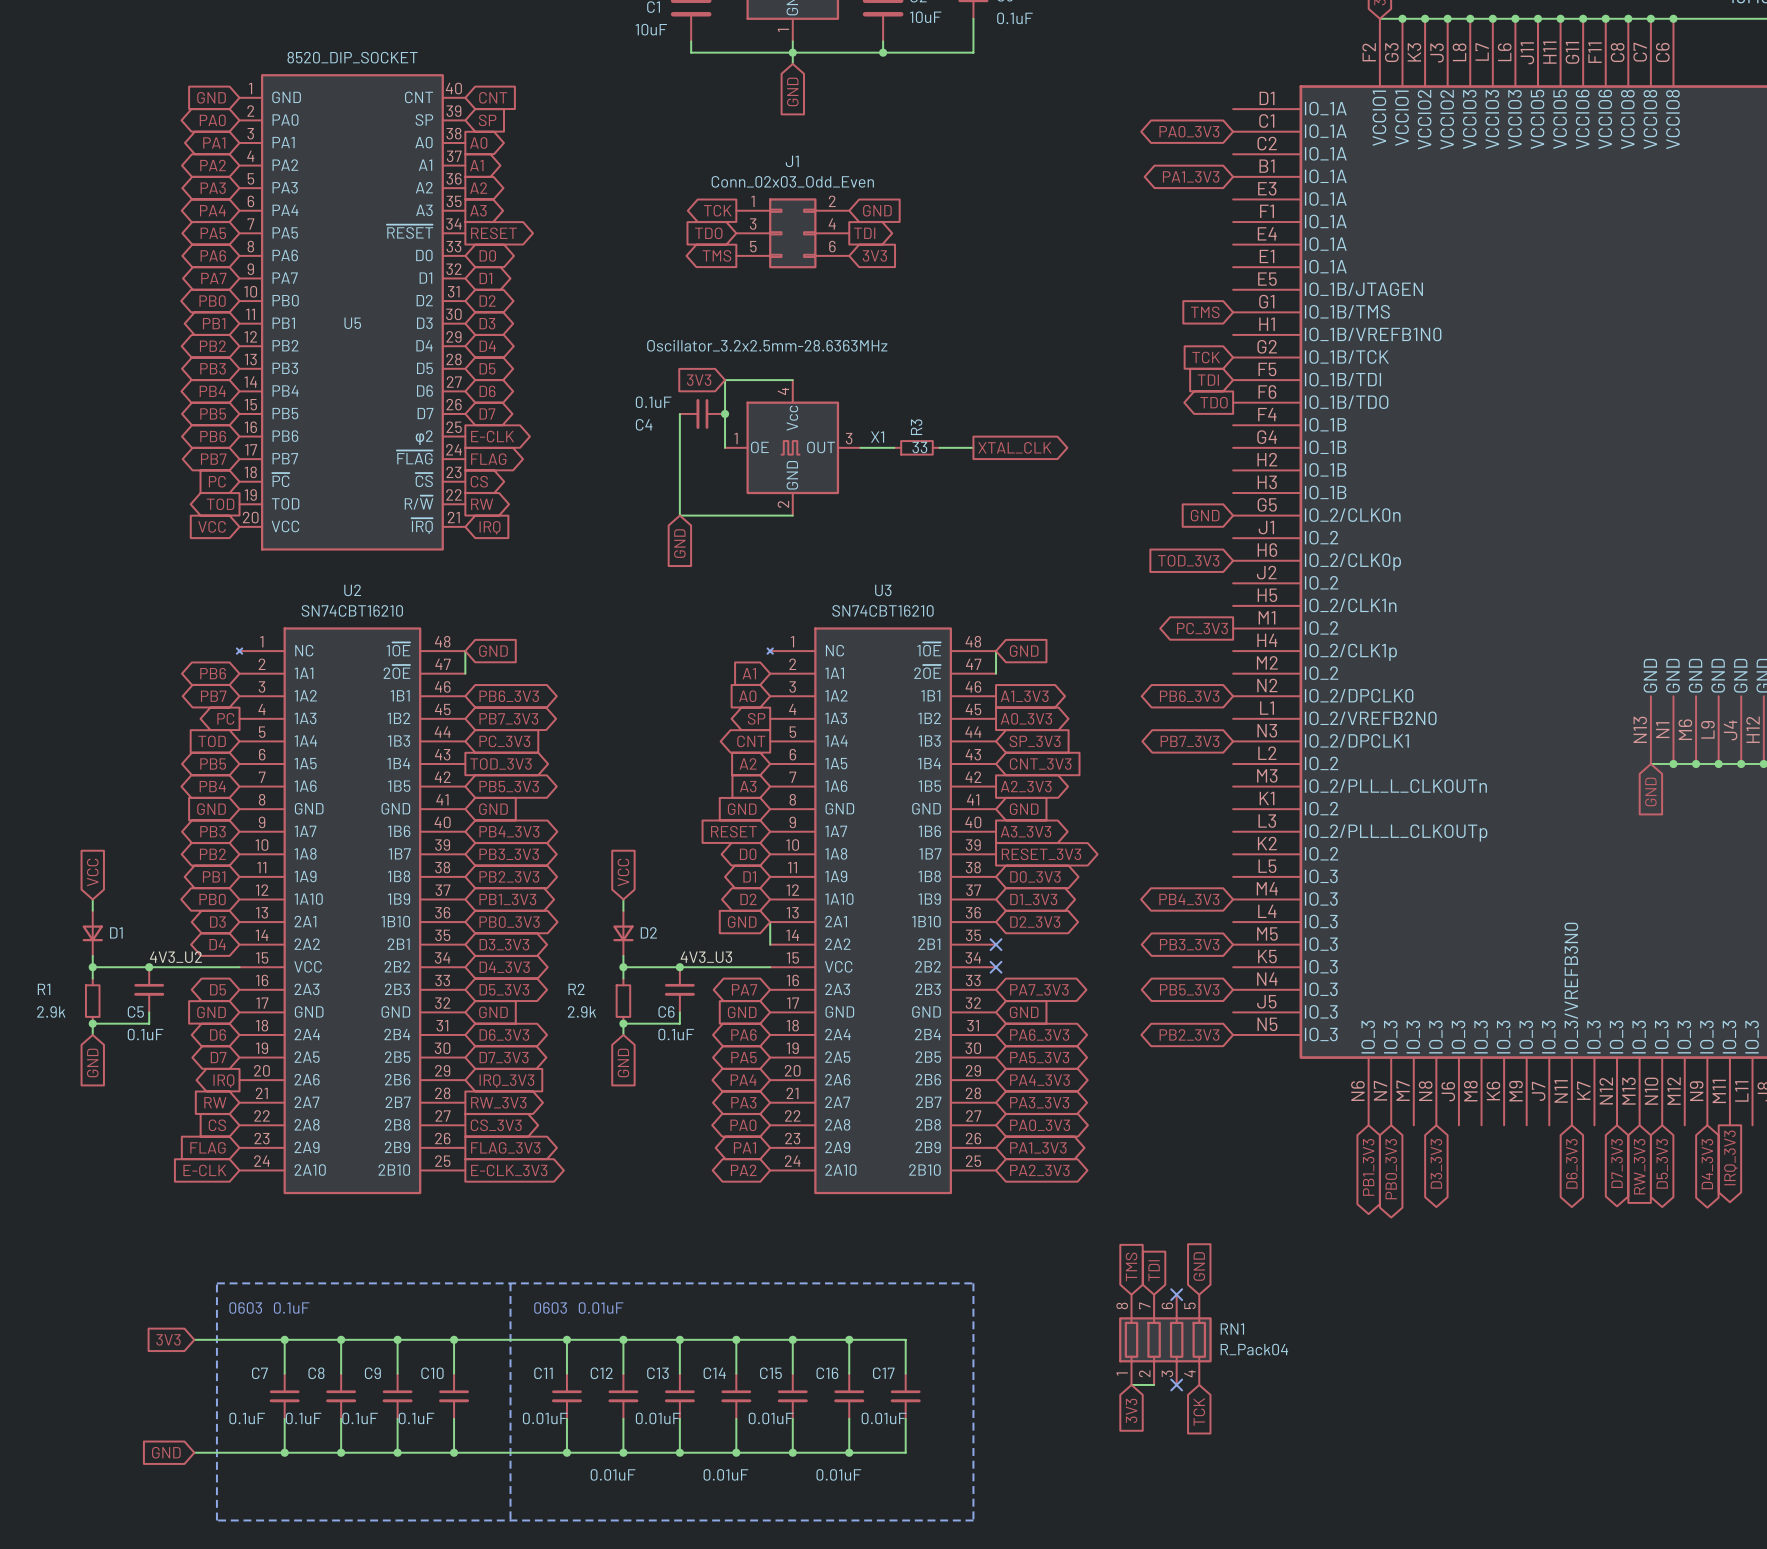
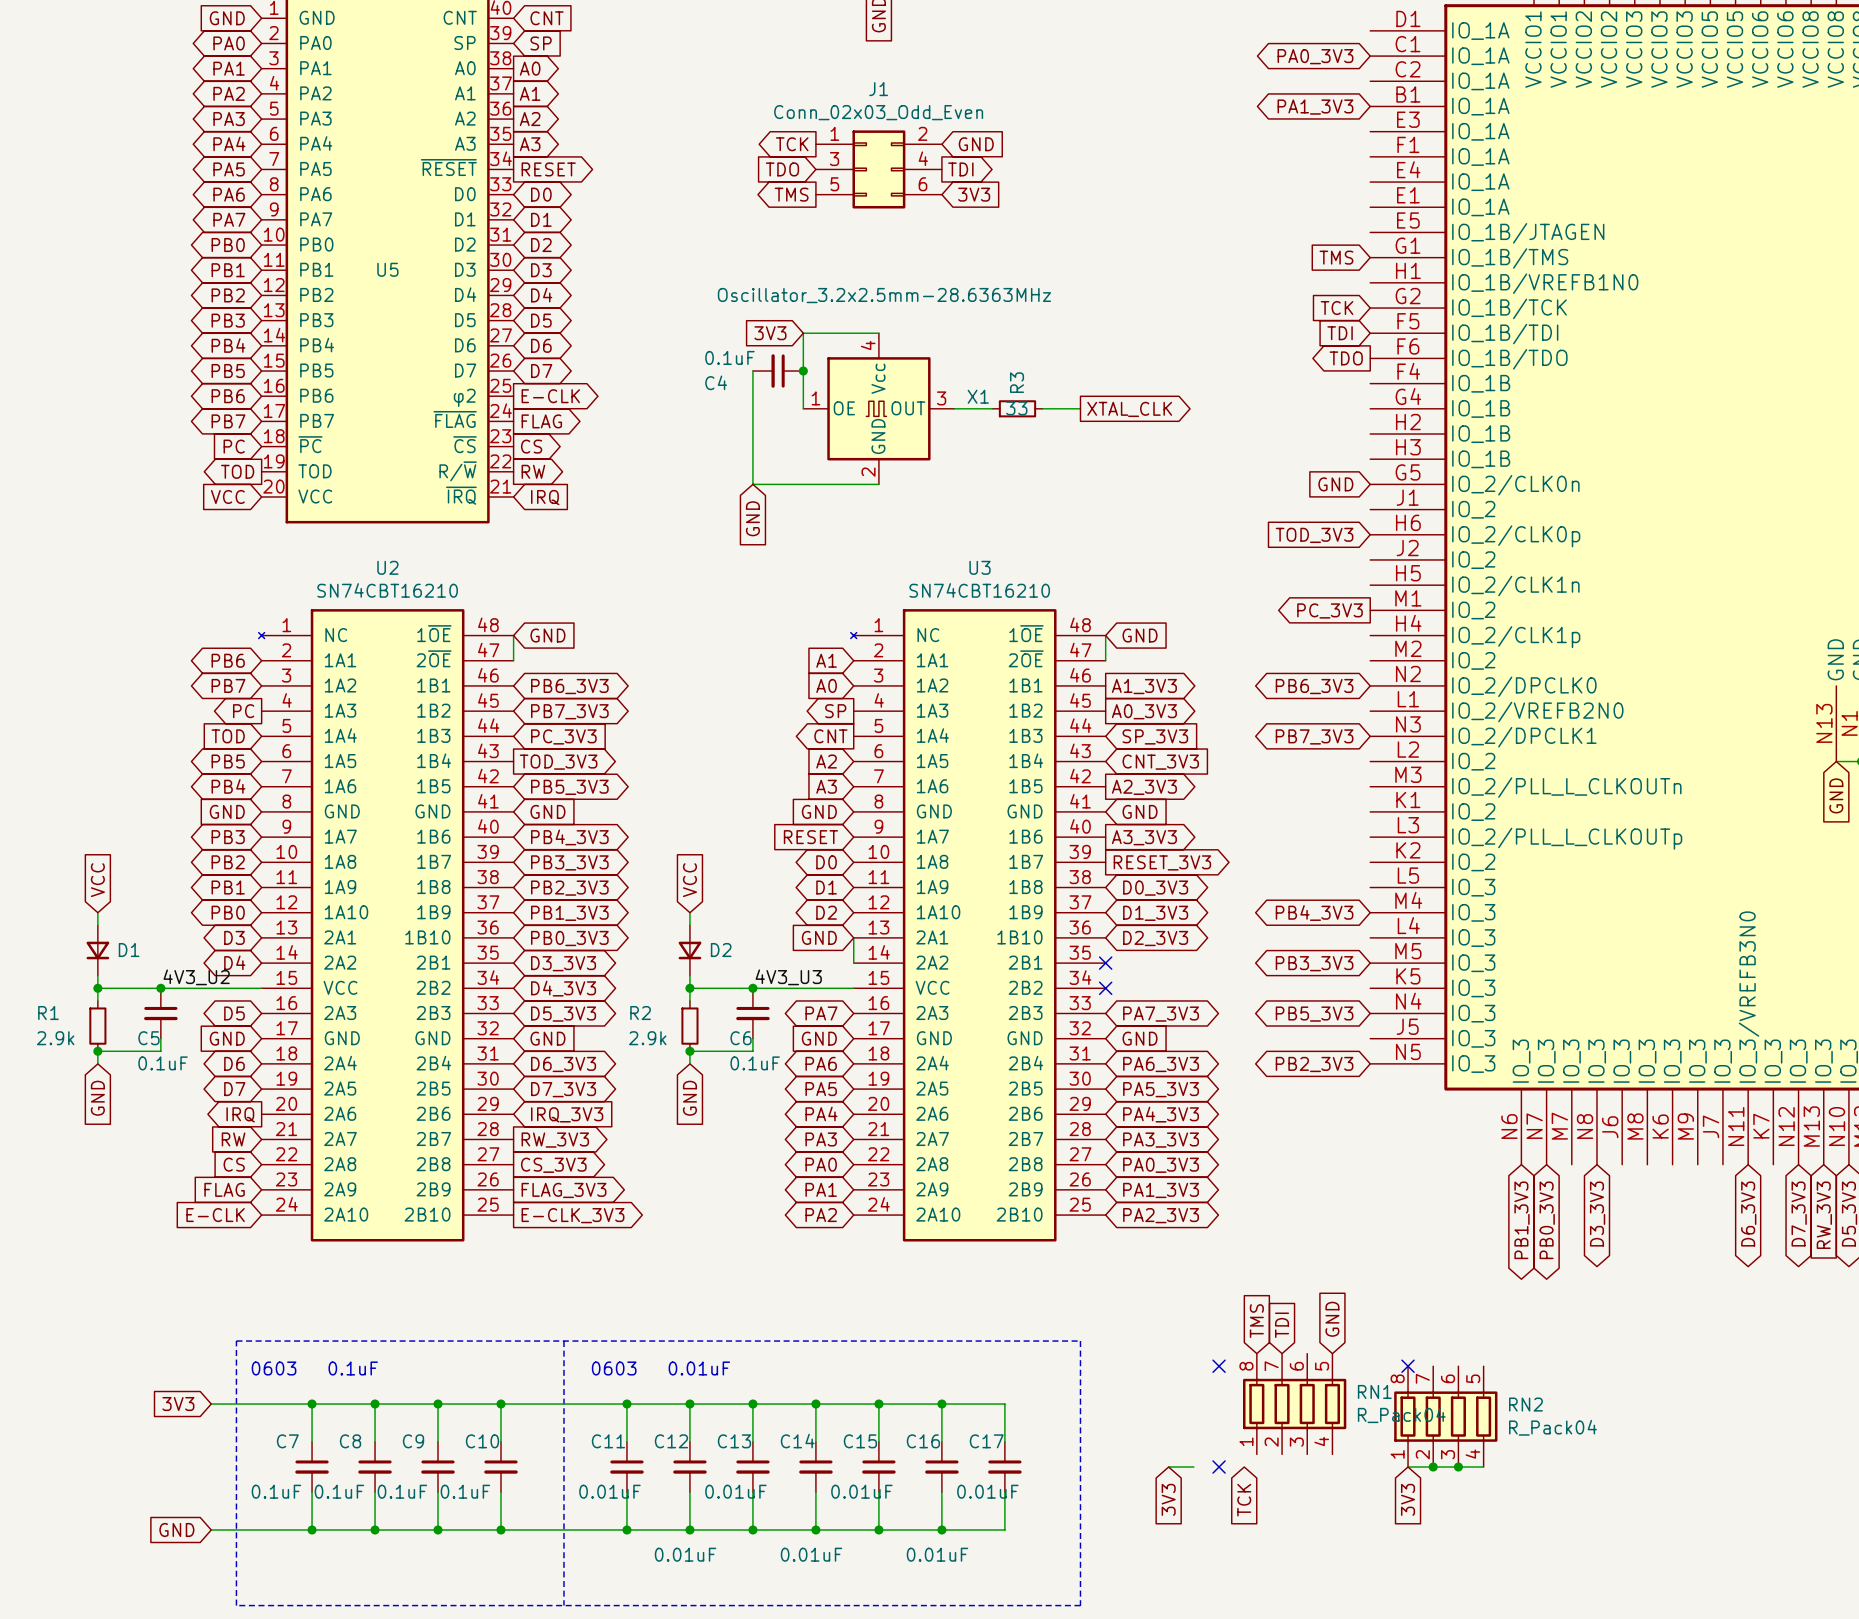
no-connect mark: (1176, 1294) -> none
no-connect mark: none -> (1219, 1366)
no-connect mark: none -> (1408, 1366)
RN2: none -> R_Pack04 (1445, 1416)
wire: (1131, 1384) (1154, 1384) -> (1168, 1467) (1193, 1467)
no-connect mark: (1176, 1384) -> none
no-connect mark: none -> (1219, 1467)
wire: none -> (1408, 1467) (1483, 1467)
junction: none -> (1433, 1467)
junction: none -> (1458, 1467)
global label: 3V3 (1131, 1410) -> none
global label position: TCK (1199, 1411) -> TCK (1244, 1500)
global label: none -> 3V3 (1168, 1499)
global label: none -> 3V3 (1408, 1499)

